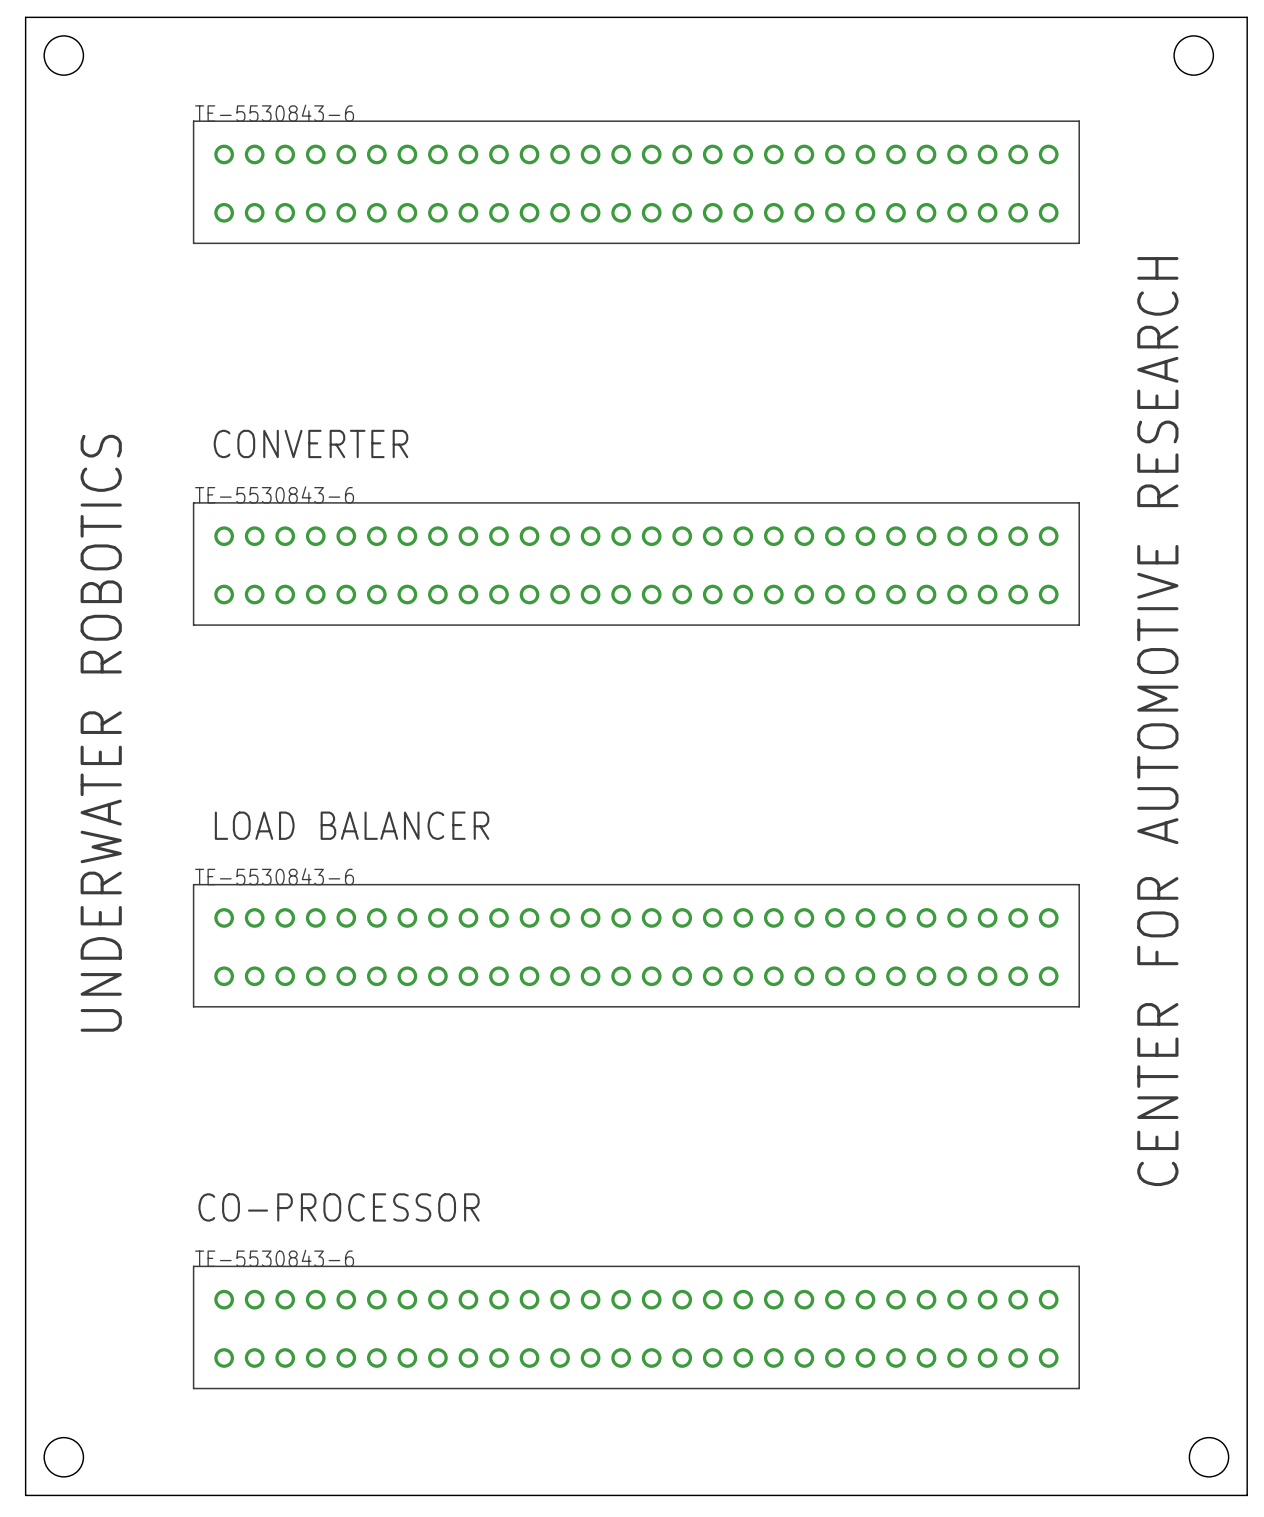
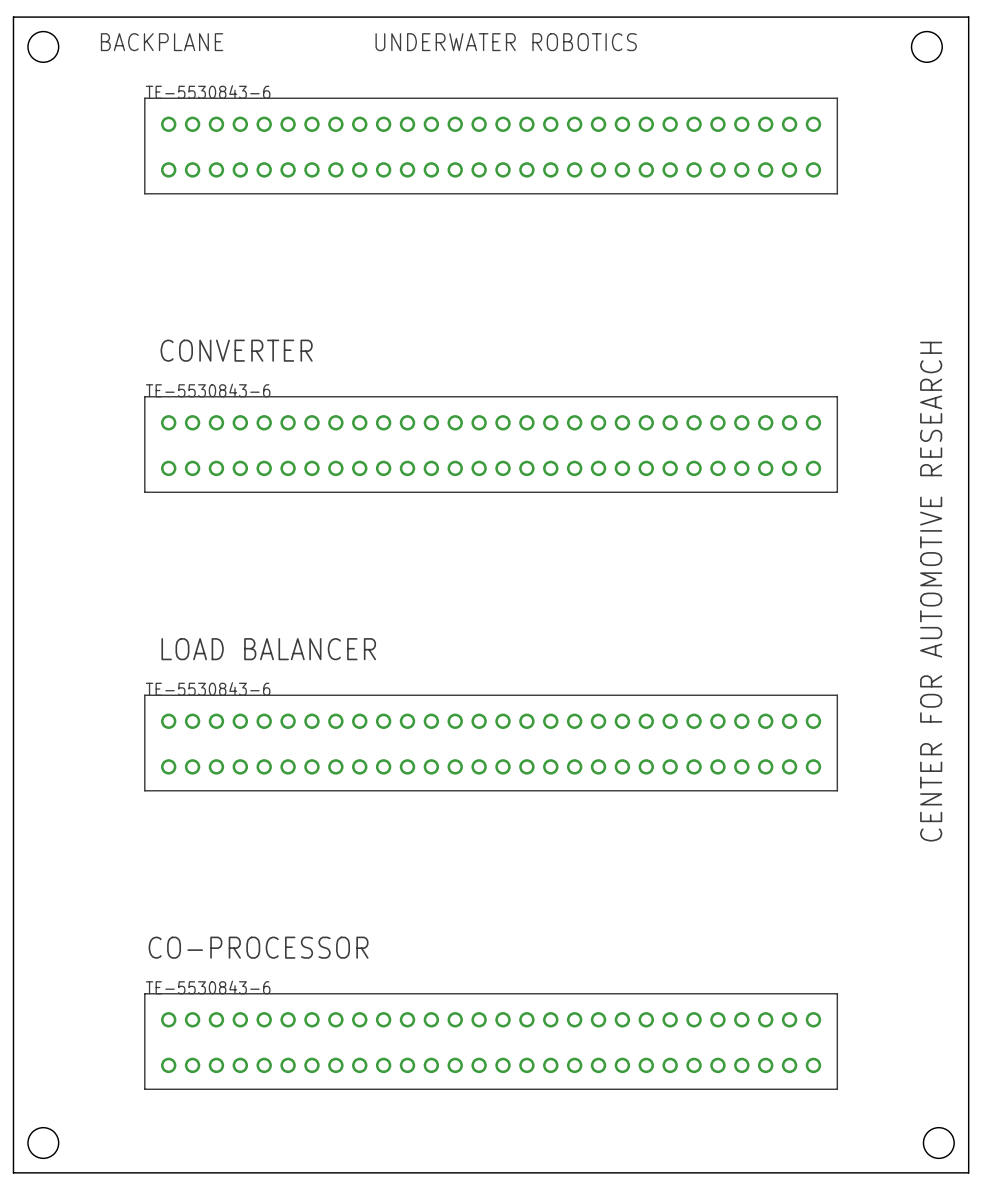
text: none -> BACKPLANE (162, 42)
text: none -> UNDERWATER ROBOTICS (506, 42)
text: CENTER FOR AUTOMOTIVE RESEARCH (1157, 721) -> none
text: UNDERWATER ROBOTICS (101, 733) -> none
text: none -> CENTER FOR AUTOMOTIVE RESEARCH (931, 591)

